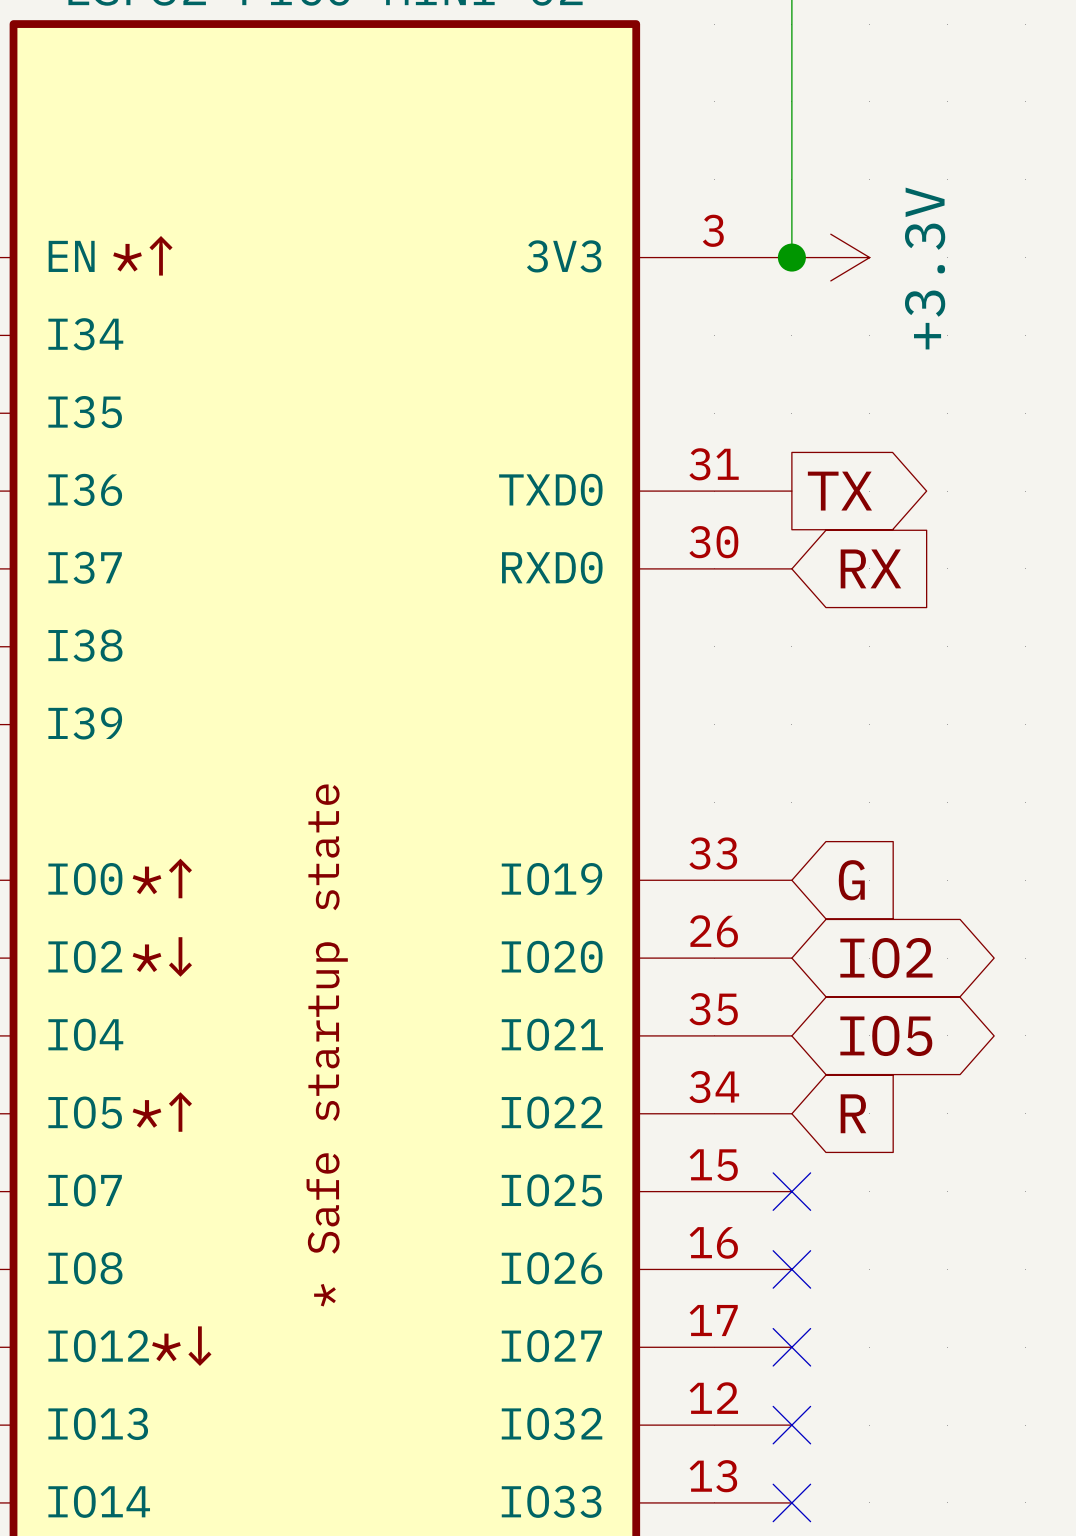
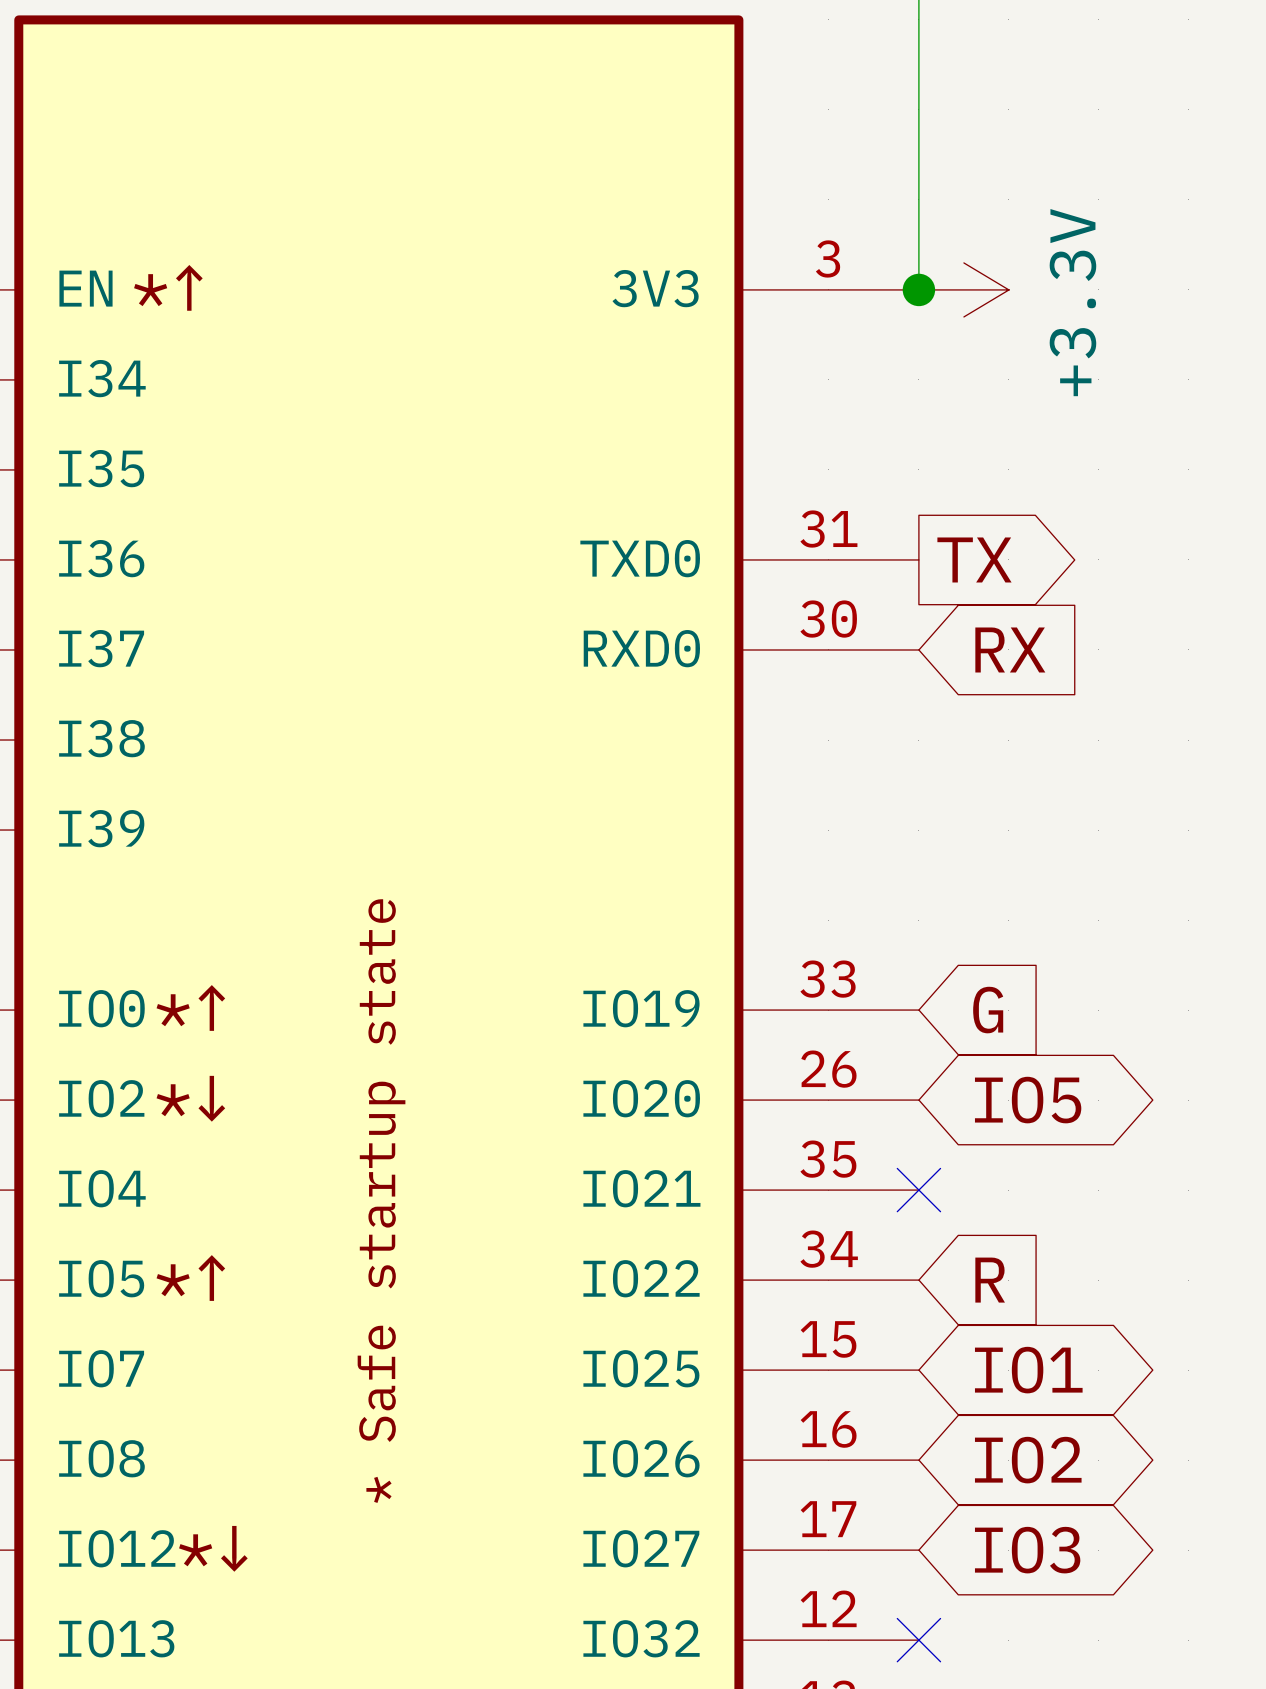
global label: IO2 (886, 958) -> IO5 (1028, 1100)
no-connect mark: none -> (918, 1190)
global label: IO5 (886, 1035) -> none
no-connect mark: (791, 1191) -> none
global label: none -> IO1 (1028, 1370)
no-connect mark: (791, 1269) -> none
global label: none -> IO2 (1028, 1460)
no-connect mark: (791, 1347) -> none
global label: none -> IO3 (1027, 1550)

